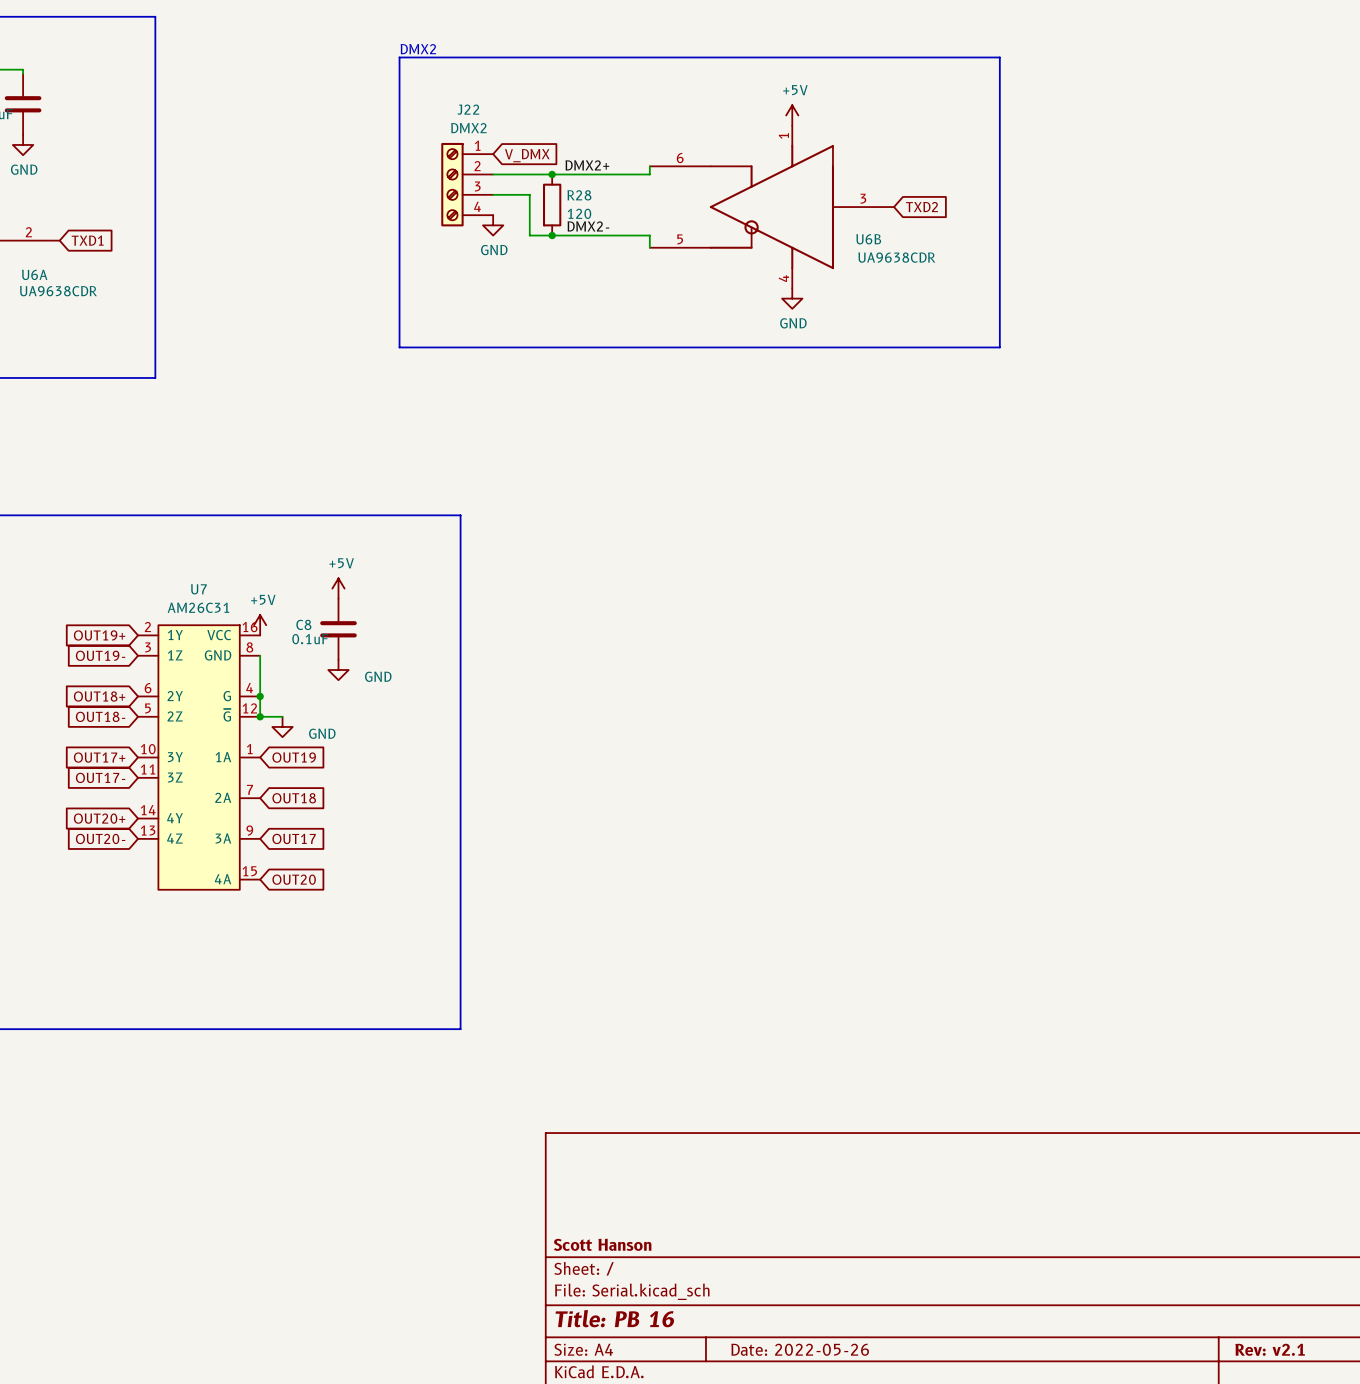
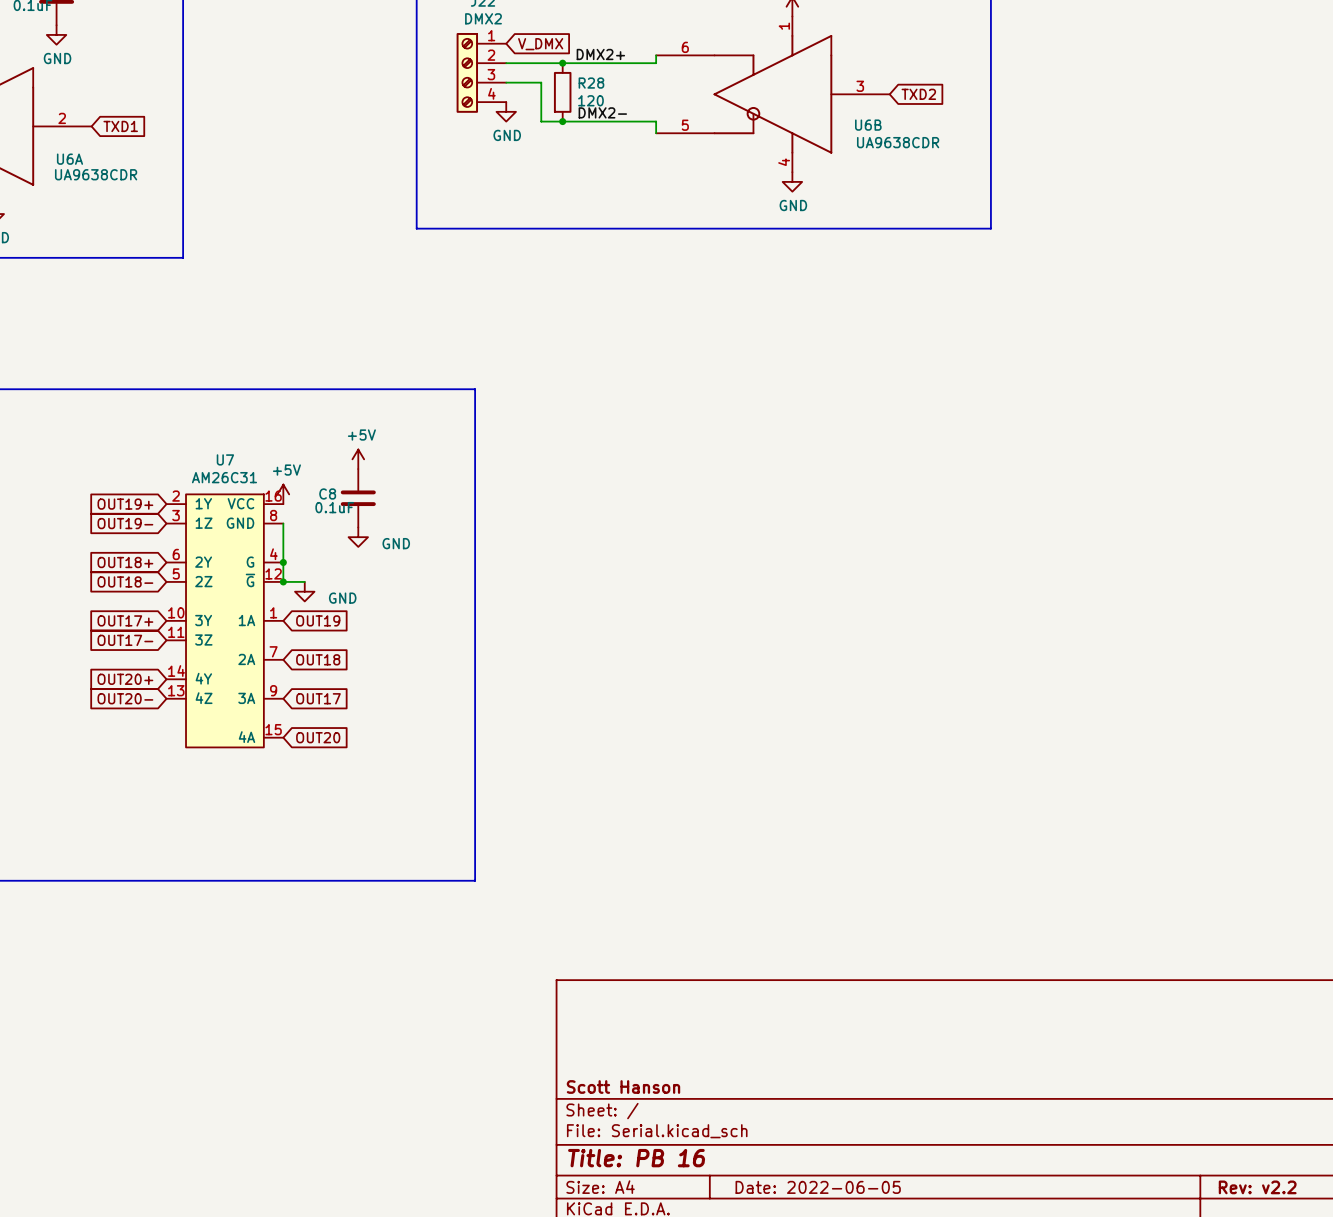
title block: Date: 2022-05-26 (800, 1349) -> Date: 2022-06-05 (818, 1187)
title block: Rev: v2.1 (1270, 1349) -> Rev: v2.2 (1257, 1187)

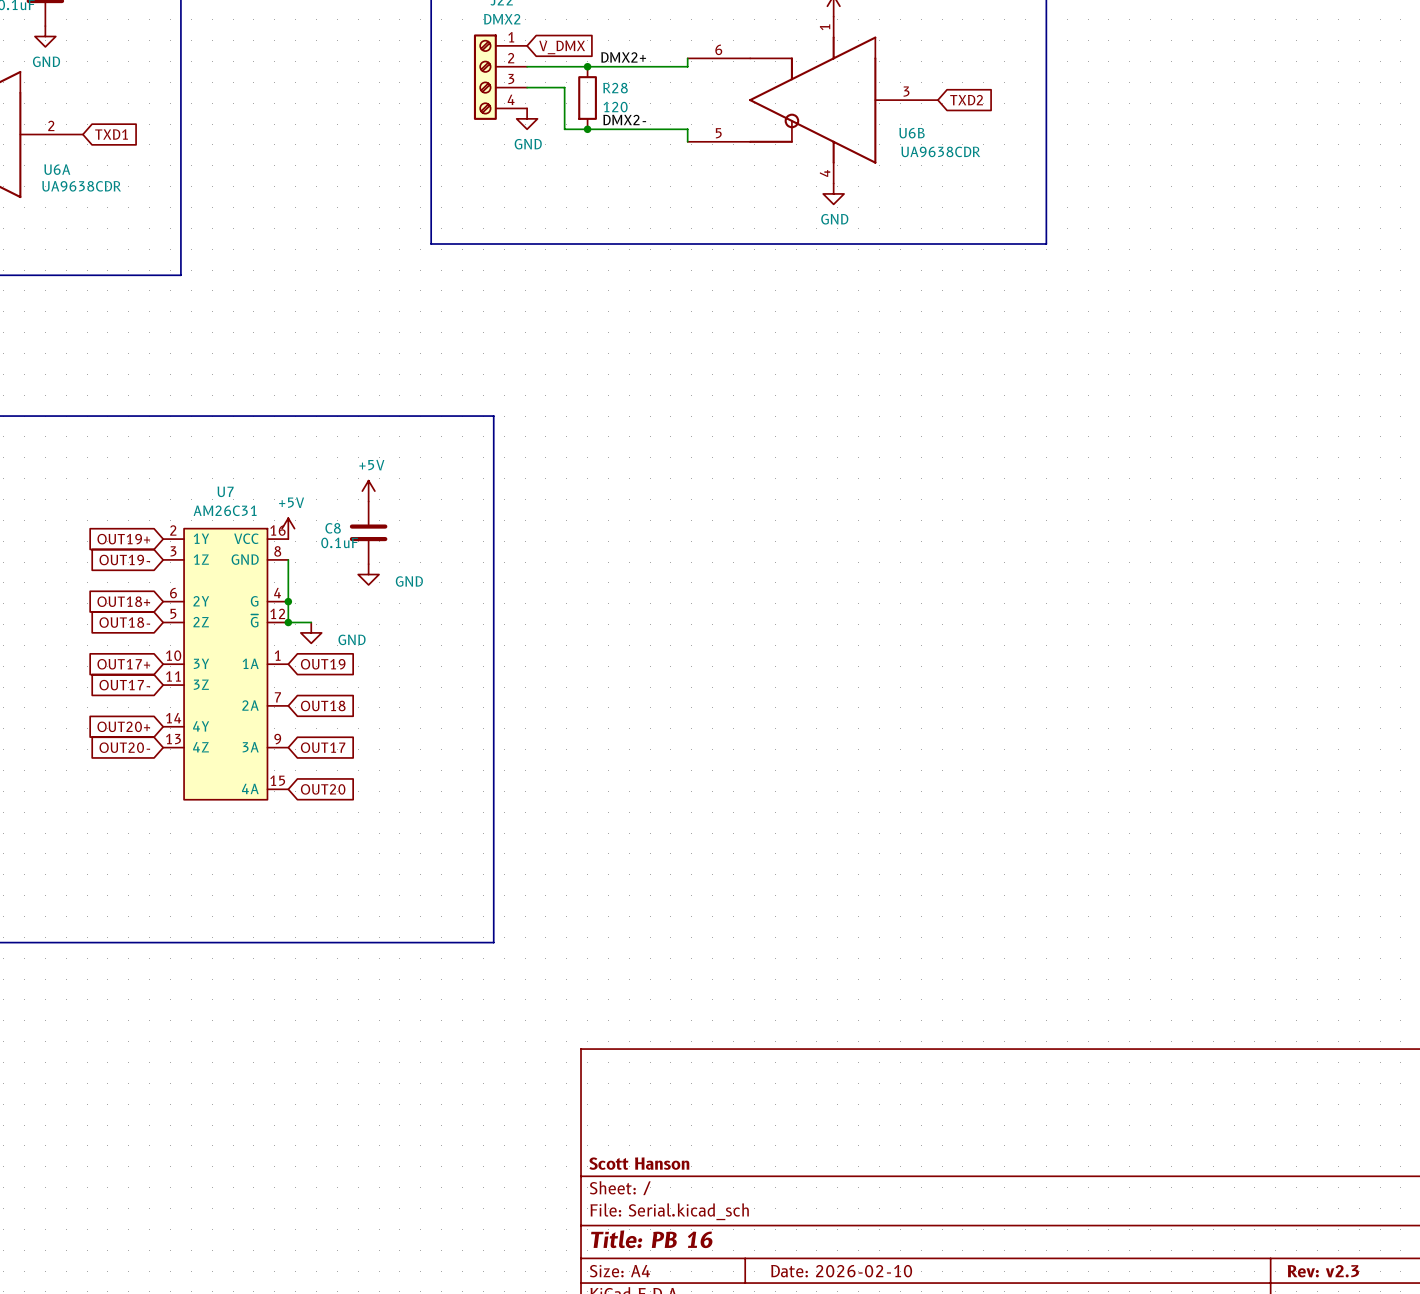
title block: Date: 2022-06-05 (818, 1187) -> Date: 2026-02-10 (841, 1271)
title block: Rev: v2.2 (1257, 1187) -> Rev: v2.3 (1323, 1271)

